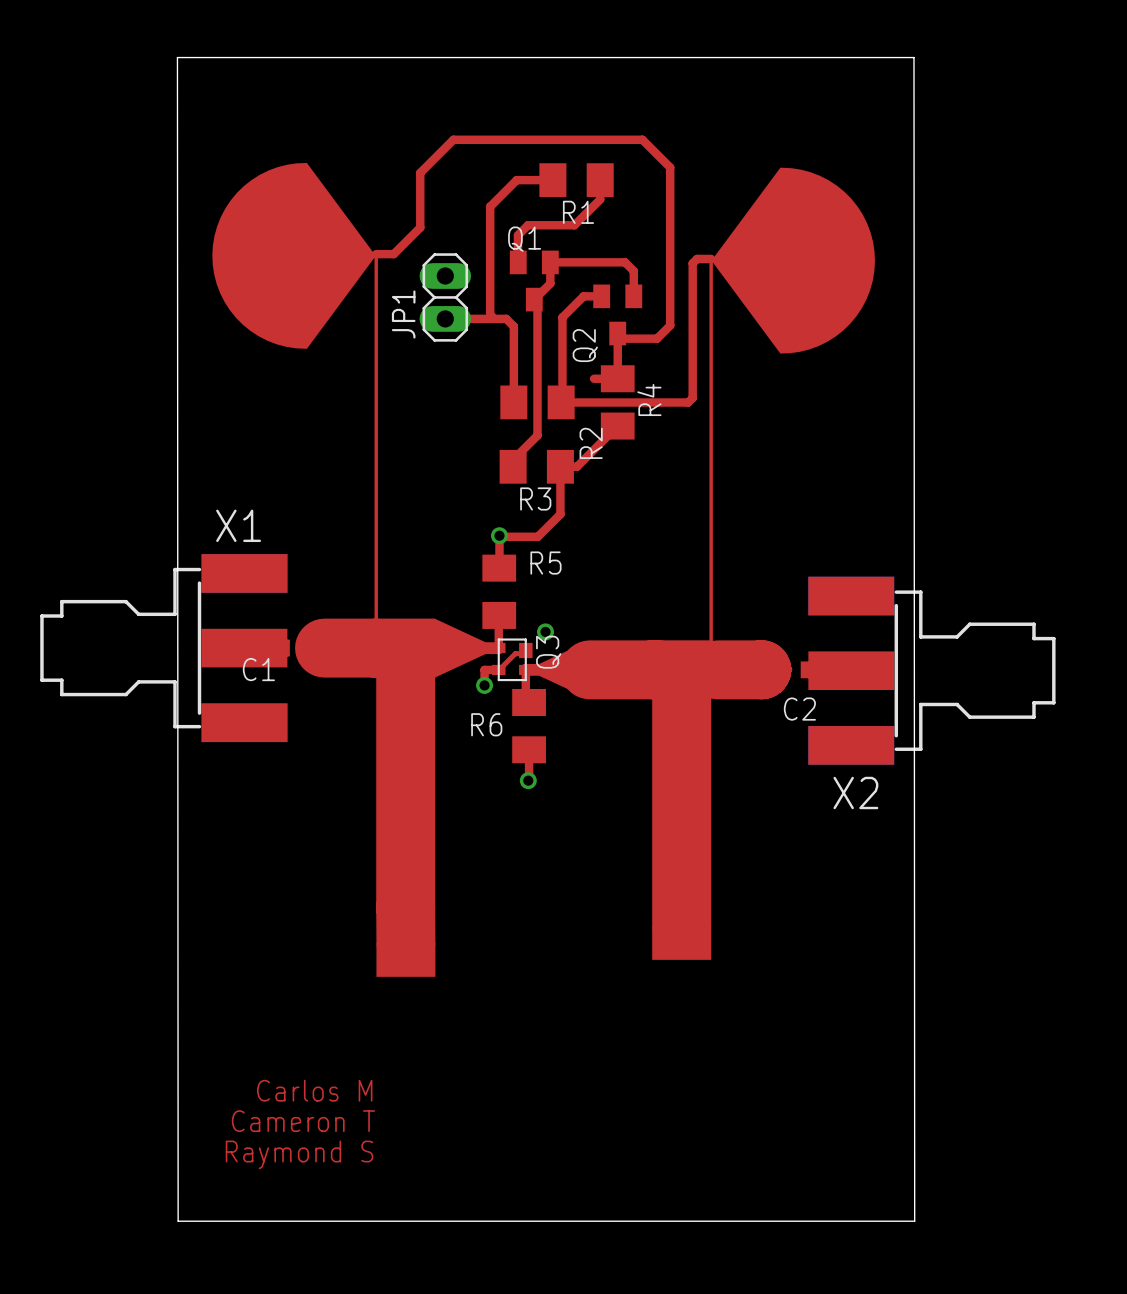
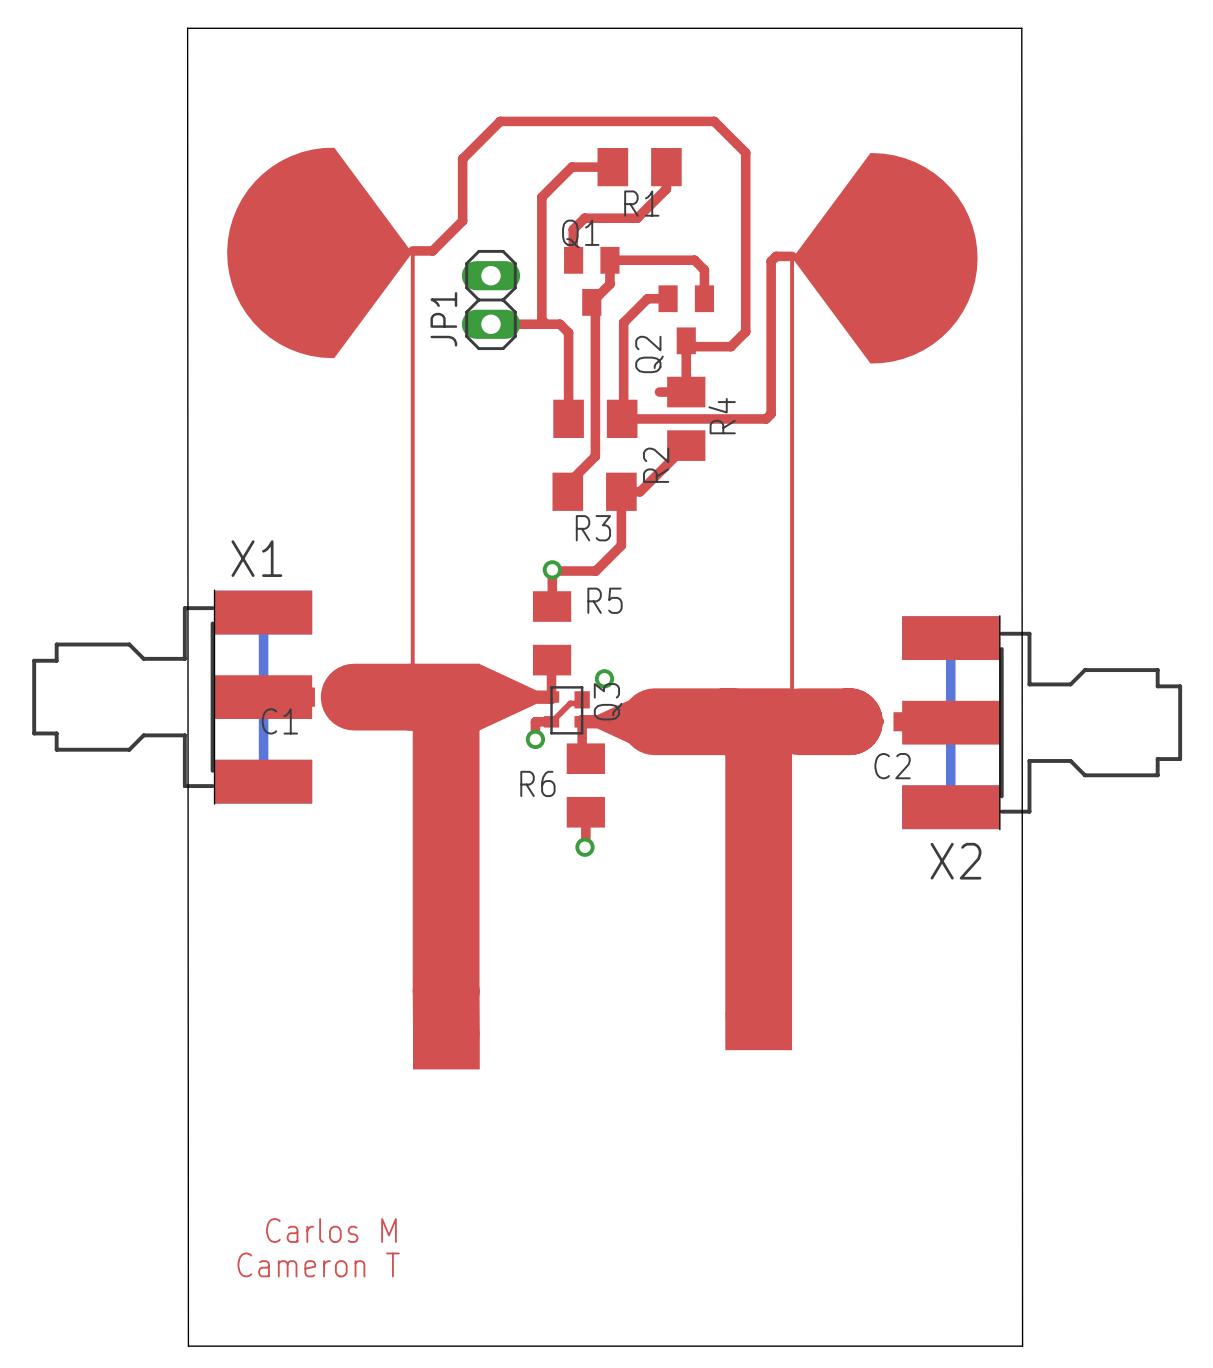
X1 footprint: [40, 554, 288, 743] -> [32, 590, 313, 805]
bottom track: none -> (263, 612) (263, 781)
X2 footprint: [808, 576, 1056, 765] -> [902, 615, 1183, 830]
bottom track: none -> (950, 638) (950, 807)
text: Carlos M (314, 1090) -> none
text: Cameron T (303, 1121) -> Carlos M (331, 1230)
text: Raymond S (299, 1154) -> Cameron T (318, 1264)

